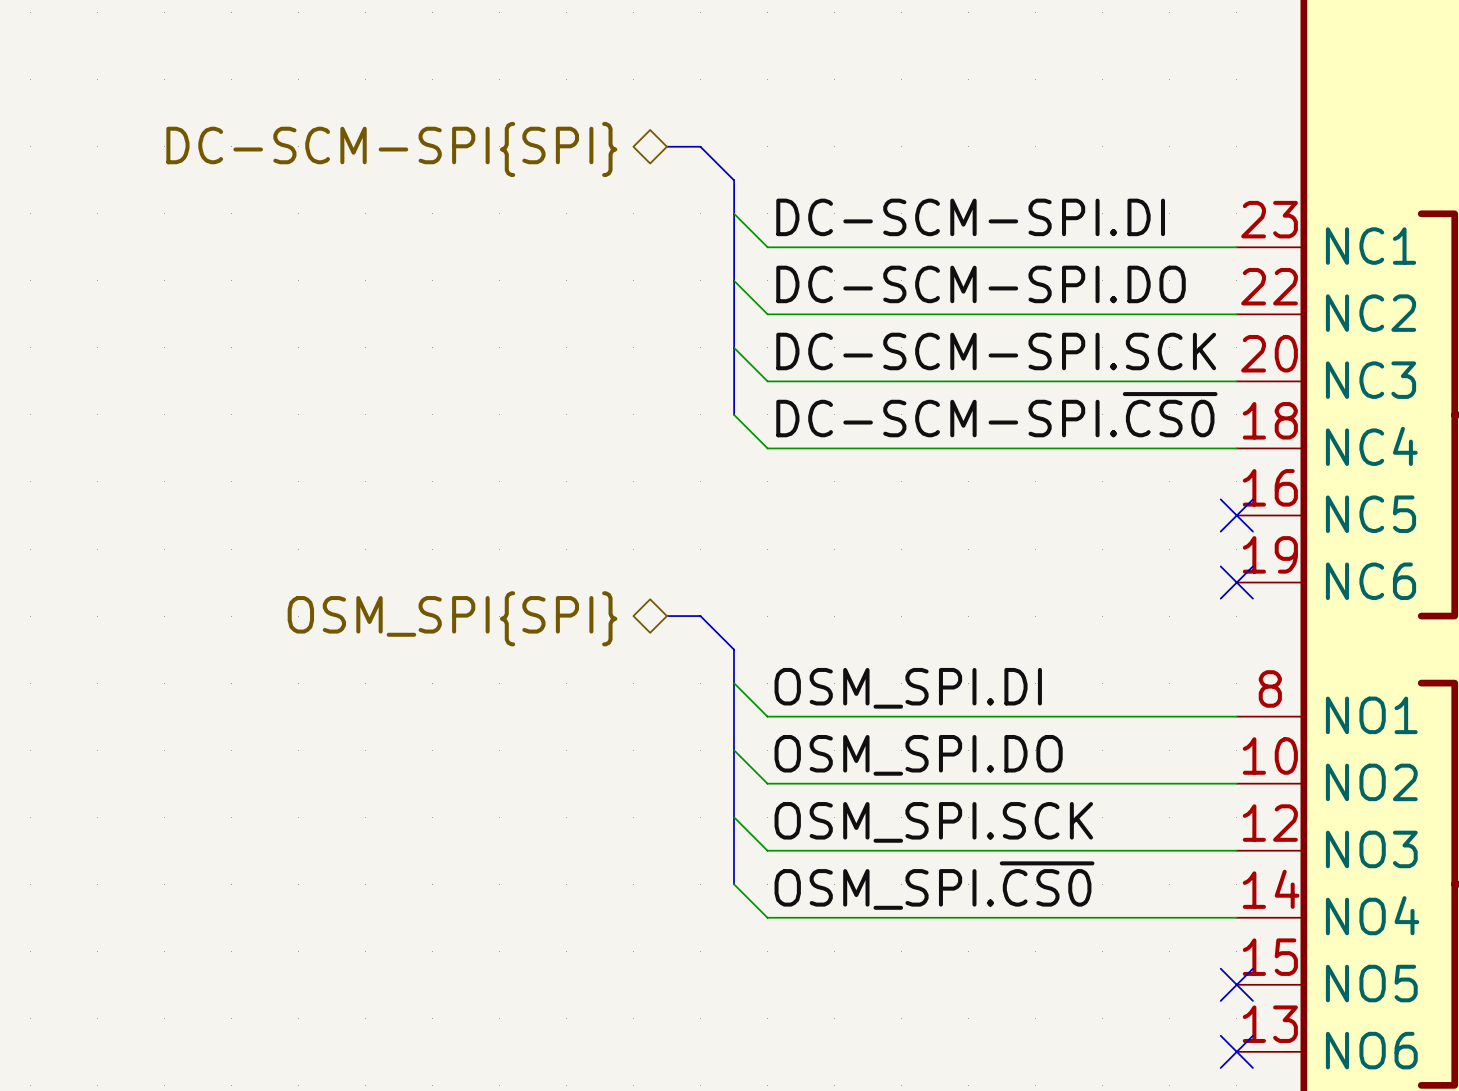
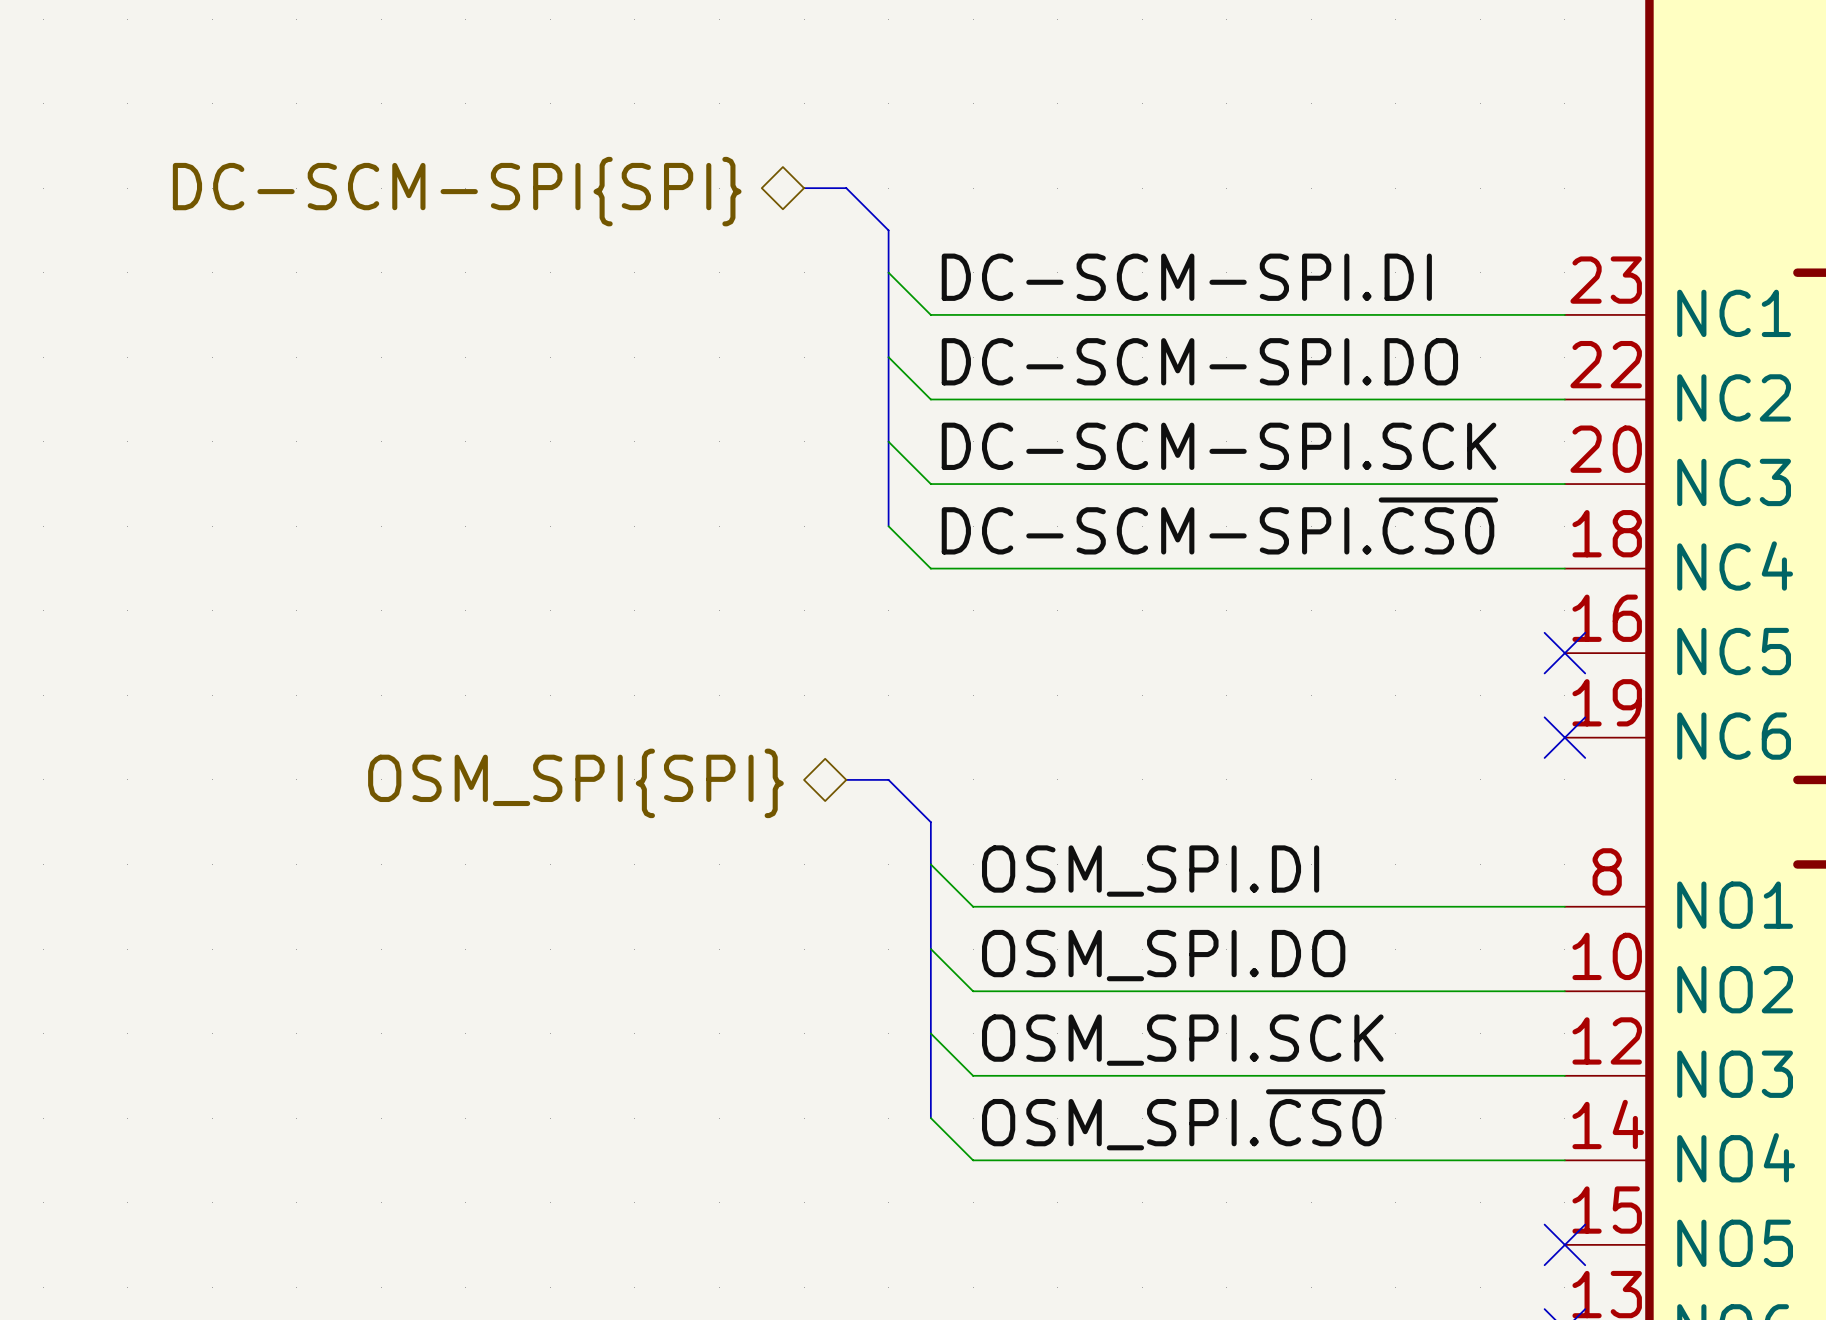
bus: none -> (804, 188) (846, 188) (888, 230) (888, 526)
bus: (666, 146) (700, 146) (733, 180) -> none
hierarchical label position: DC-SCM-SPI{SPI} (391, 149) -> DC-SCM-SPI{SPI} (457, 191)
bus: (734, 180) (734, 414) -> none
wire: (734, 213) (767, 247) -> (888, 272) (930, 314) (973, 314)
label position: DC-SCM-SPI.DI (970, 217) -> DC-SCM-SPI.DI (1186, 277)
wire: (734, 280) (767, 314) -> (888, 357) (930, 399) (973, 399)
label position: DC-SCM-SPI.DO (981, 284) -> DC-SCM-SPI.DO (1199, 361)
wire: (734, 347) (767, 381) -> (888, 441) (930, 484) (973, 484)
label position: DC-SCM-SPI.SCK (996, 351) -> DC-SCM-SPI.SCK (1219, 446)
wire: (734, 414) (767, 448) -> (888, 526) (930, 568) (973, 568)
label position: DC-SCM-SPI.~{CS0} (996, 414) -> DC-SCM-SPI.~{CS0} (1219, 525)

